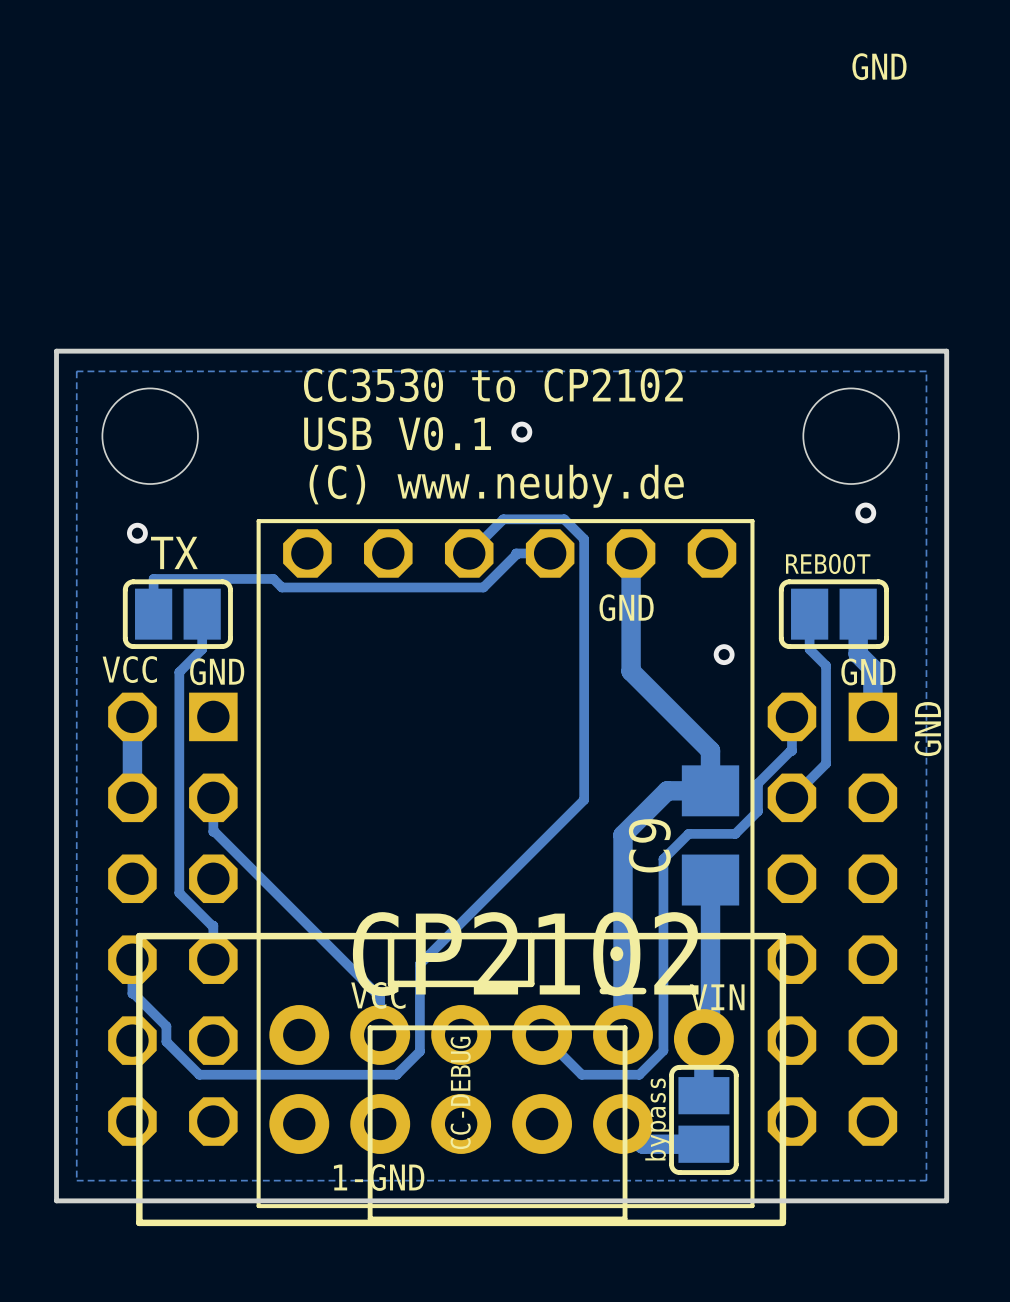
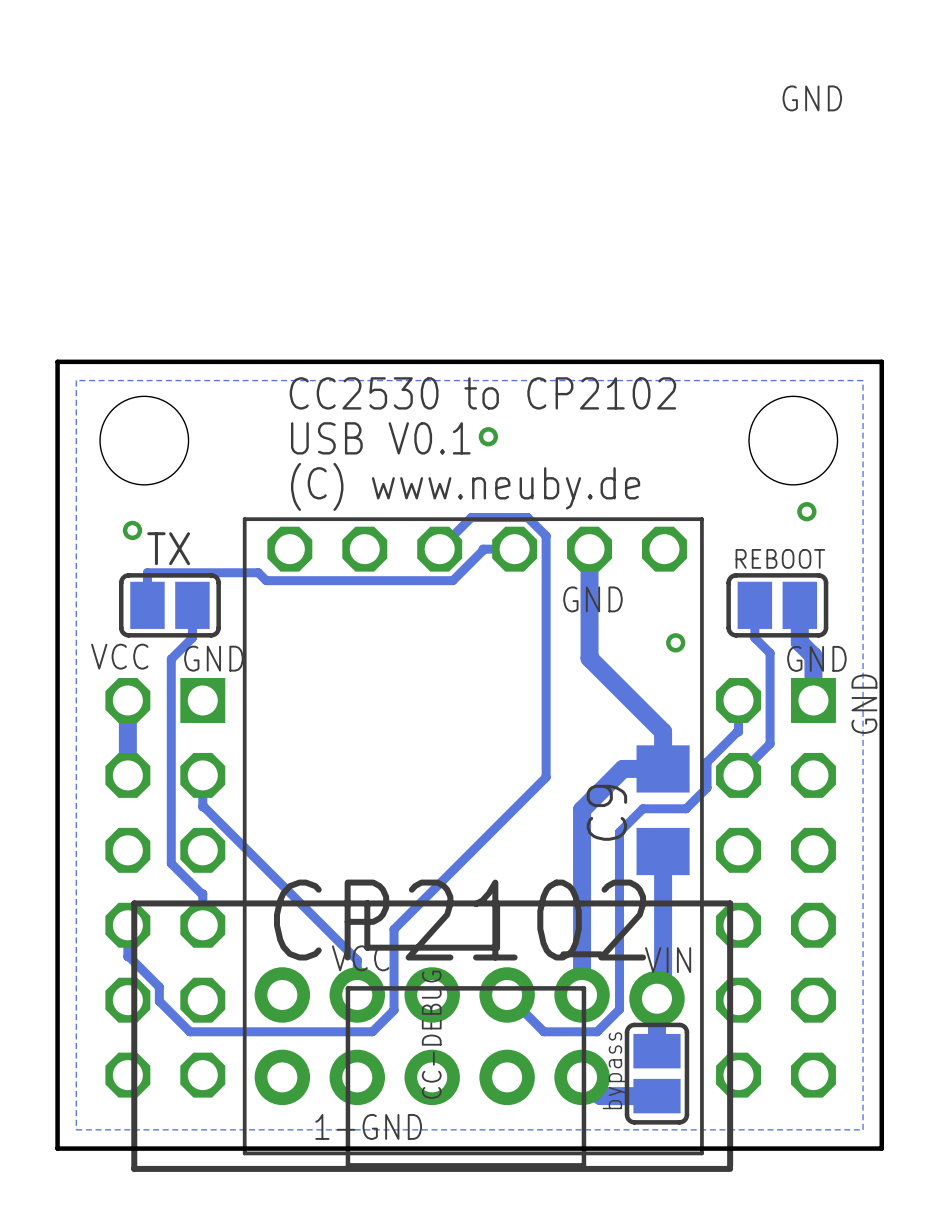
text: CC3530 to CP2102 (493, 385) -> CC2530 to CP2102 (482, 393)

